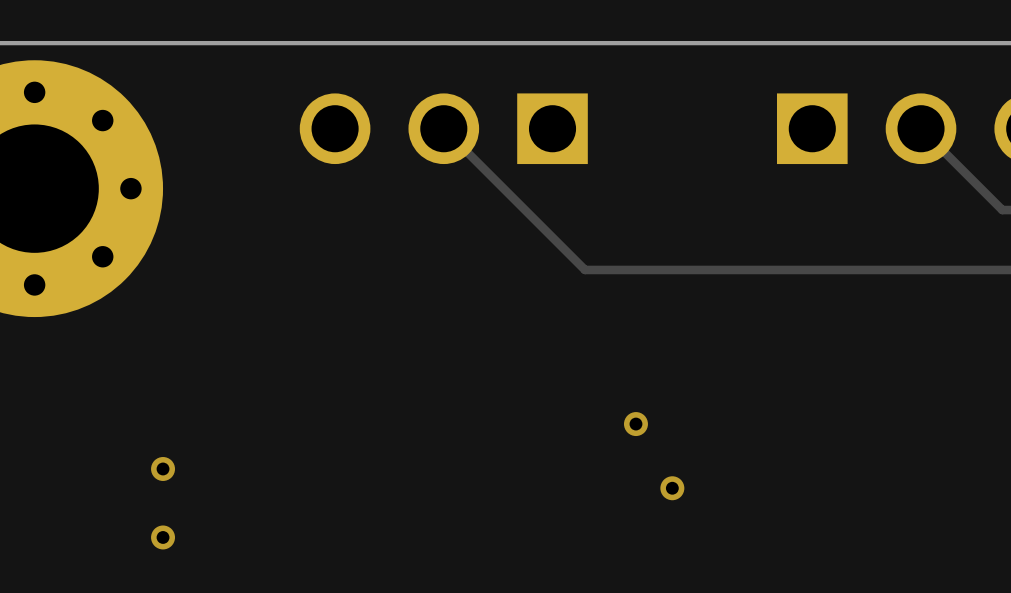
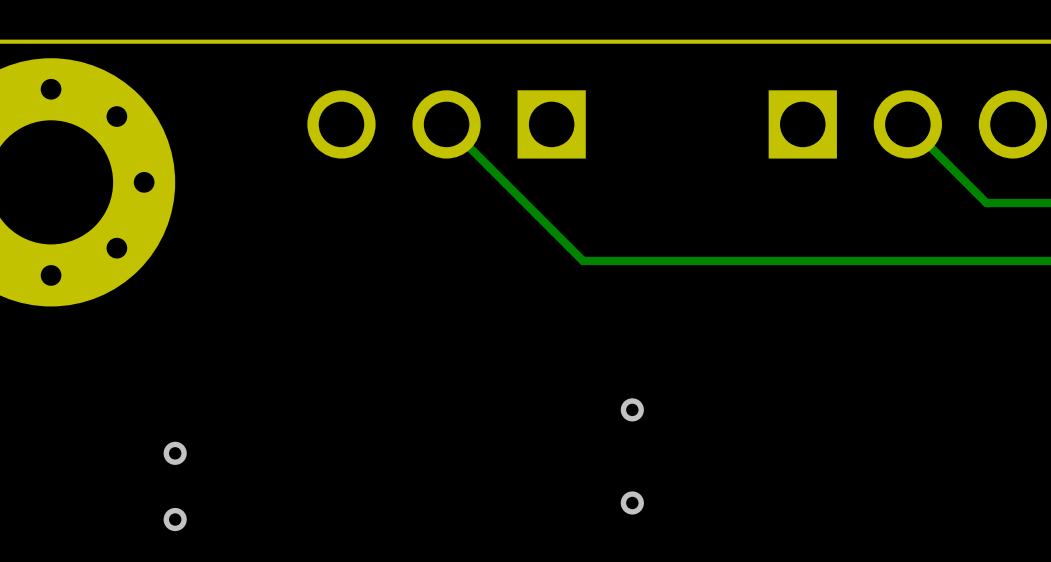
via position: (672, 488) -> (632, 502)

